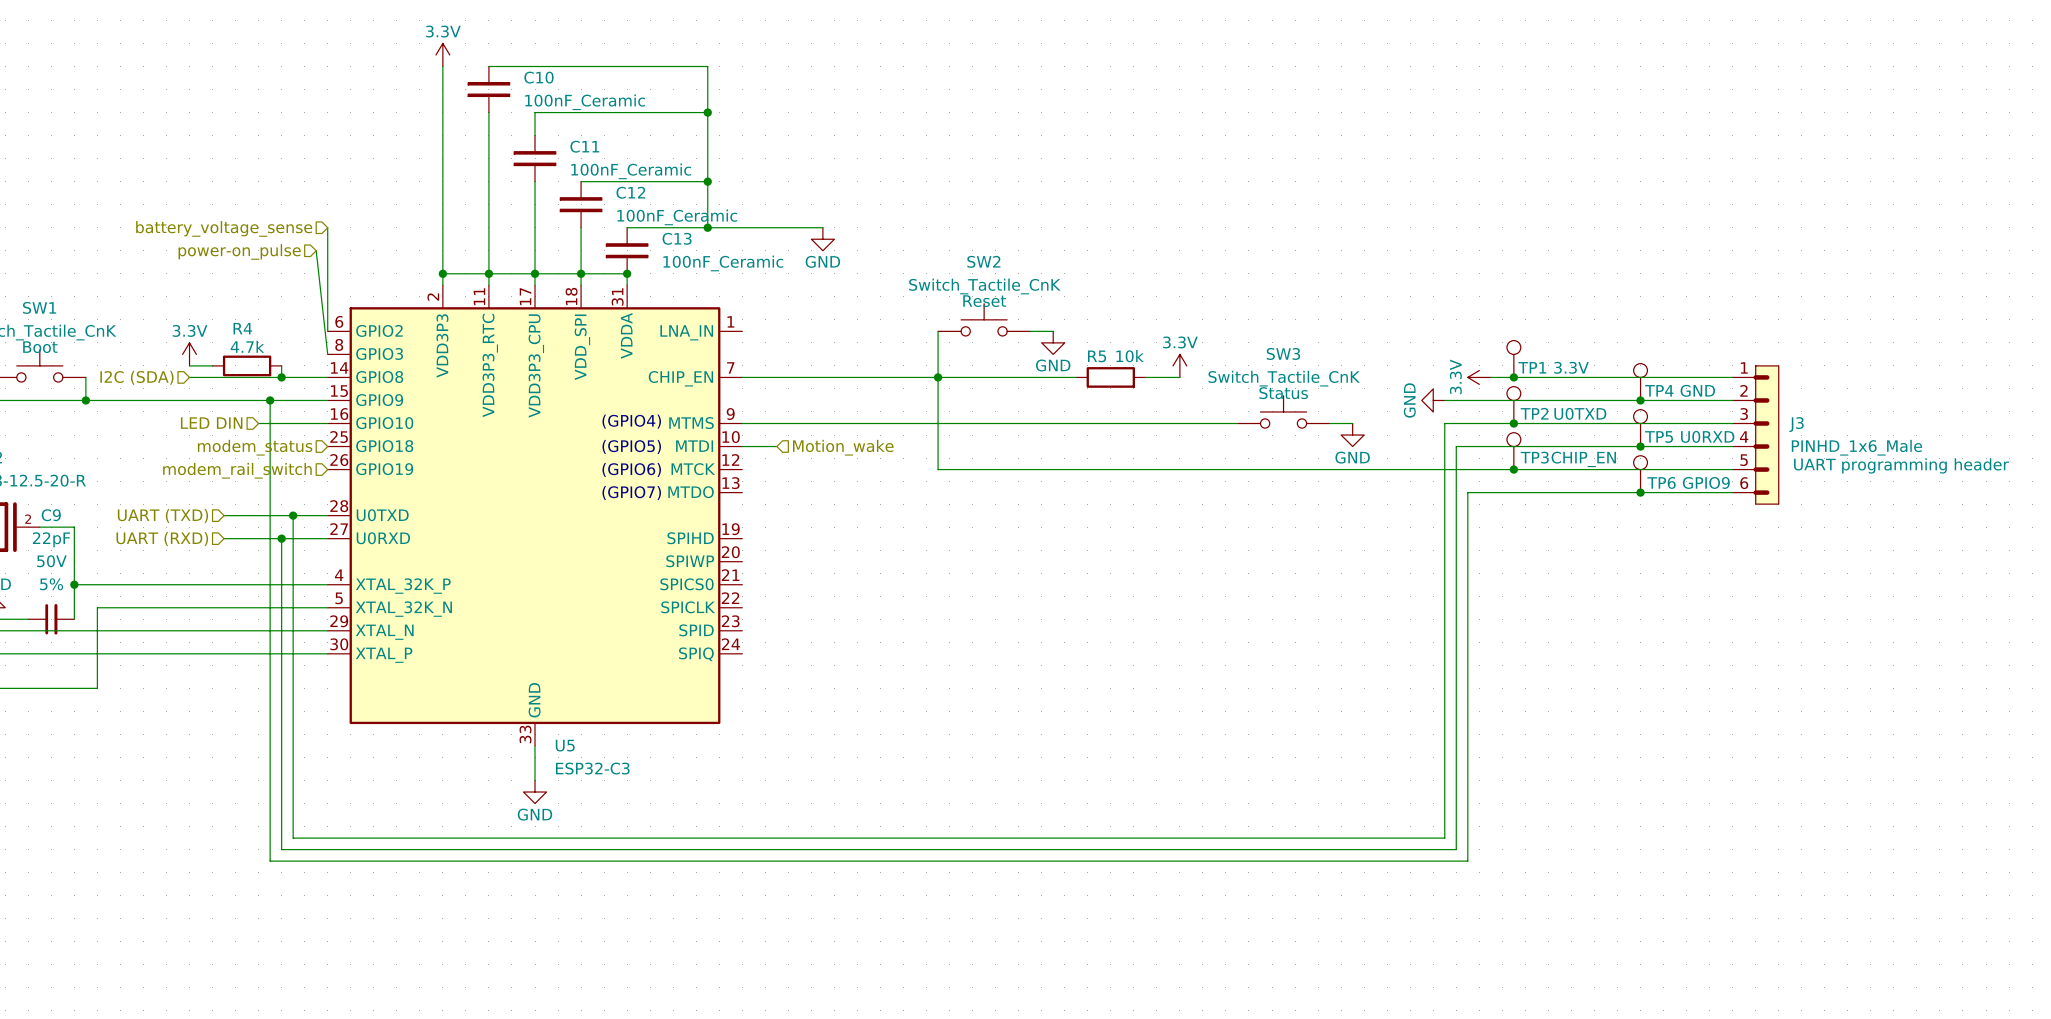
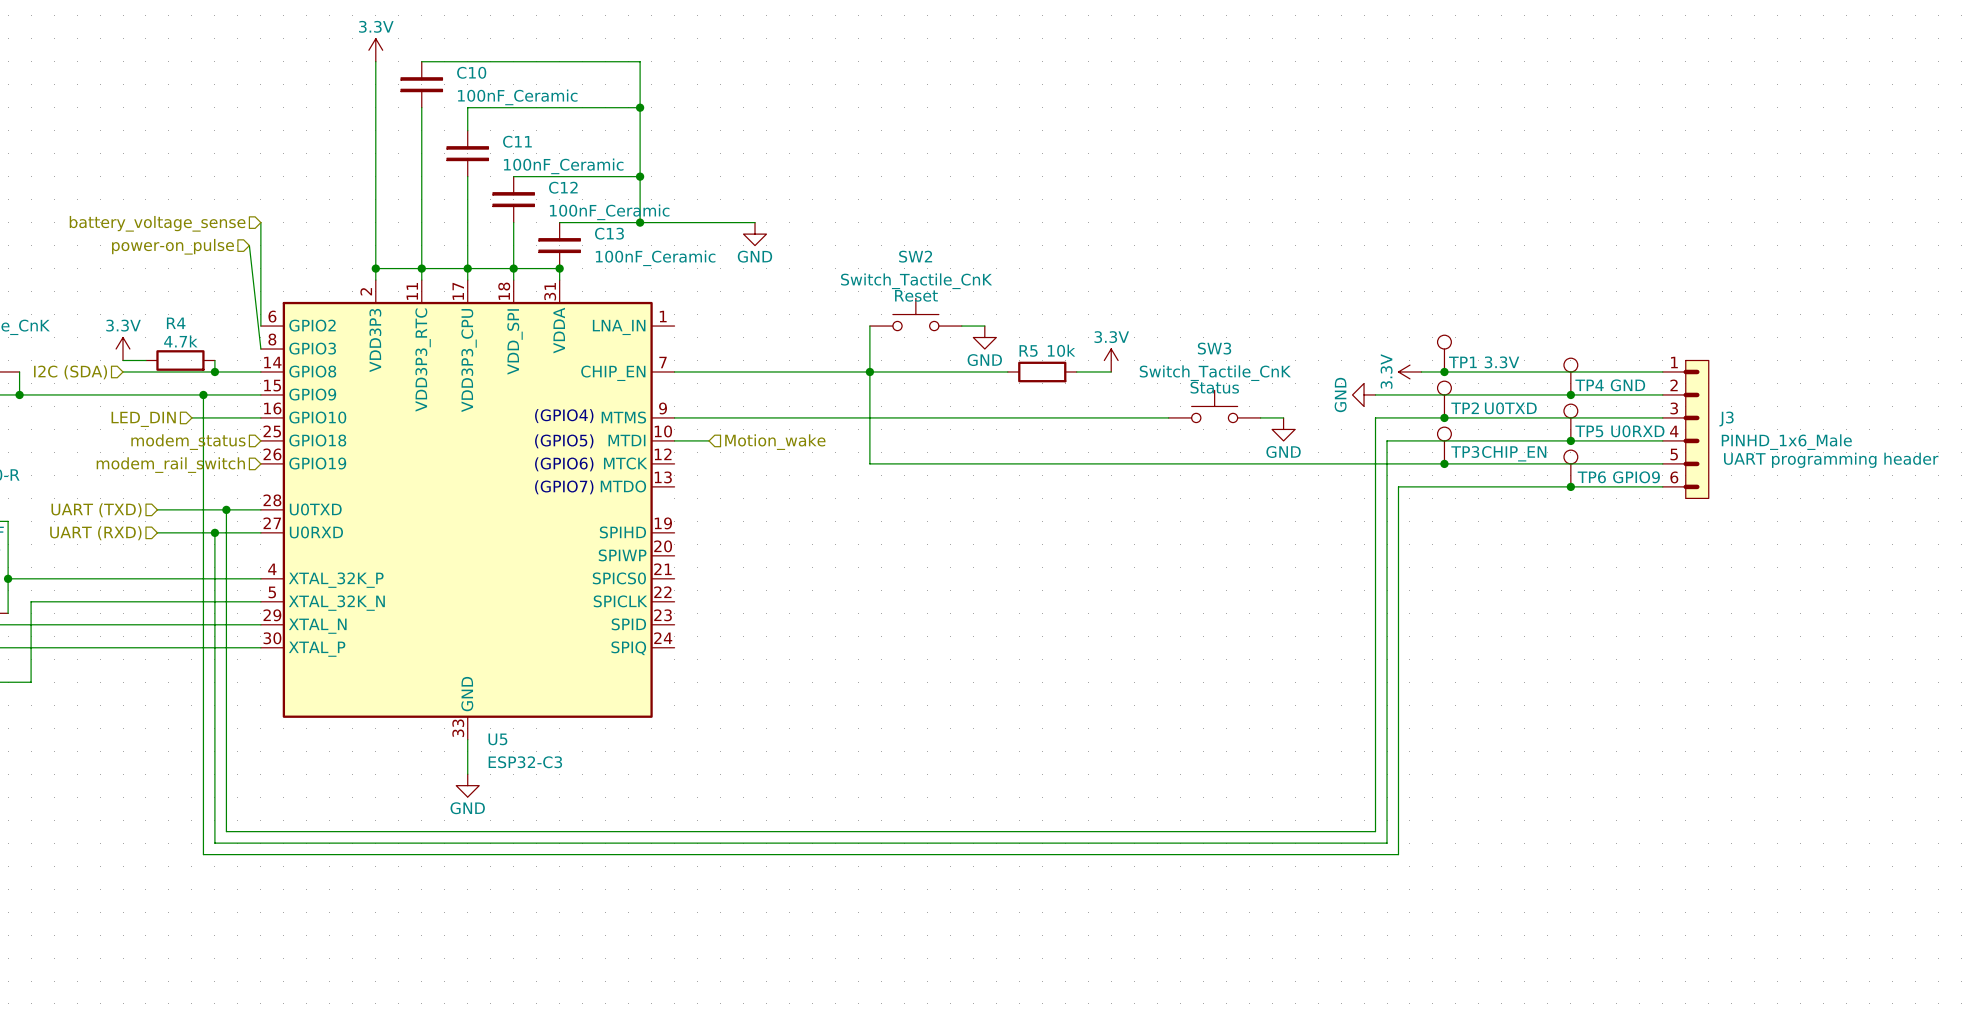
hierarchical label: LED DIN (211, 423) -> LED_DIN (143, 419)

